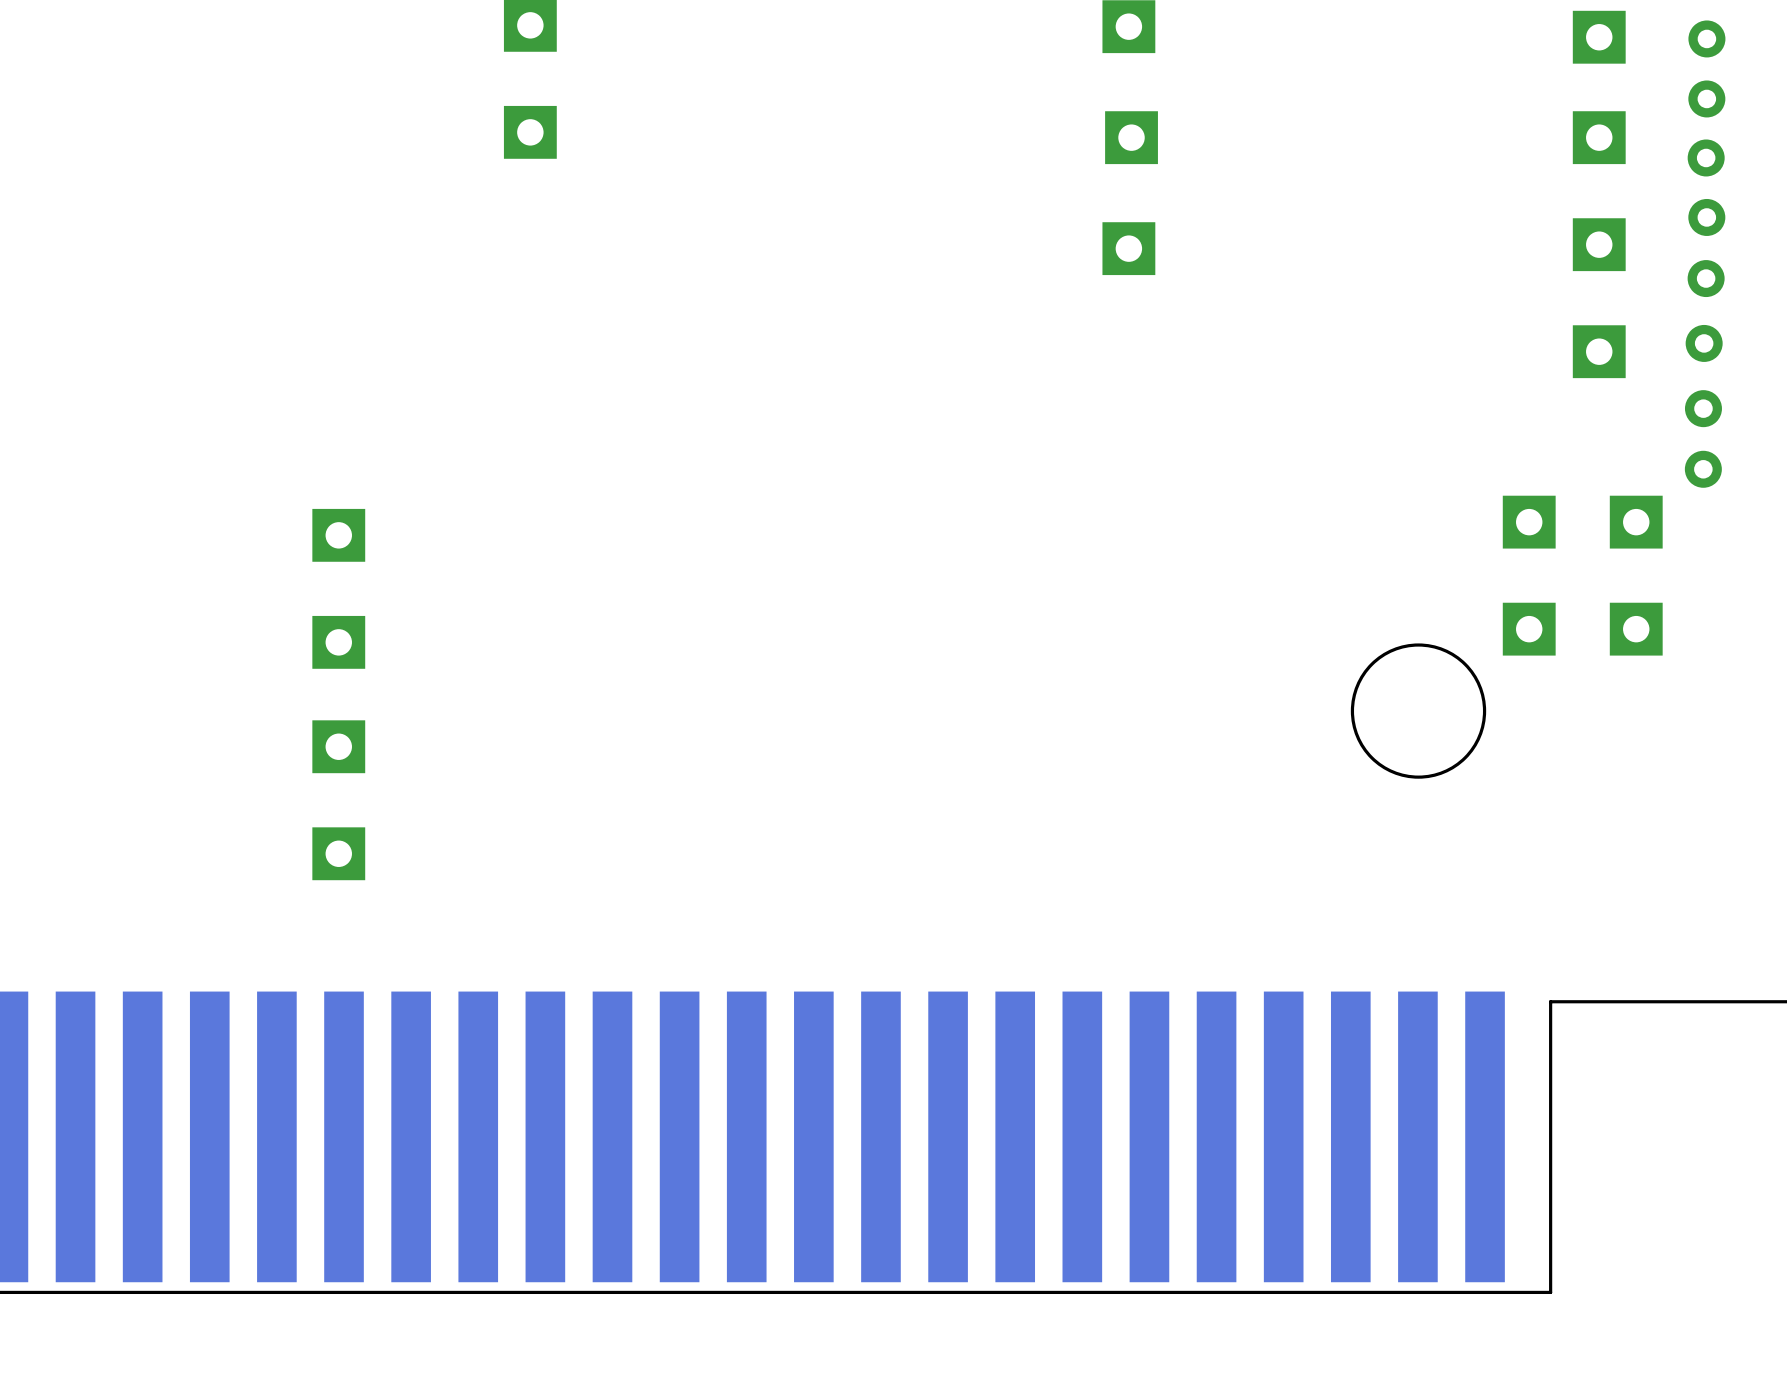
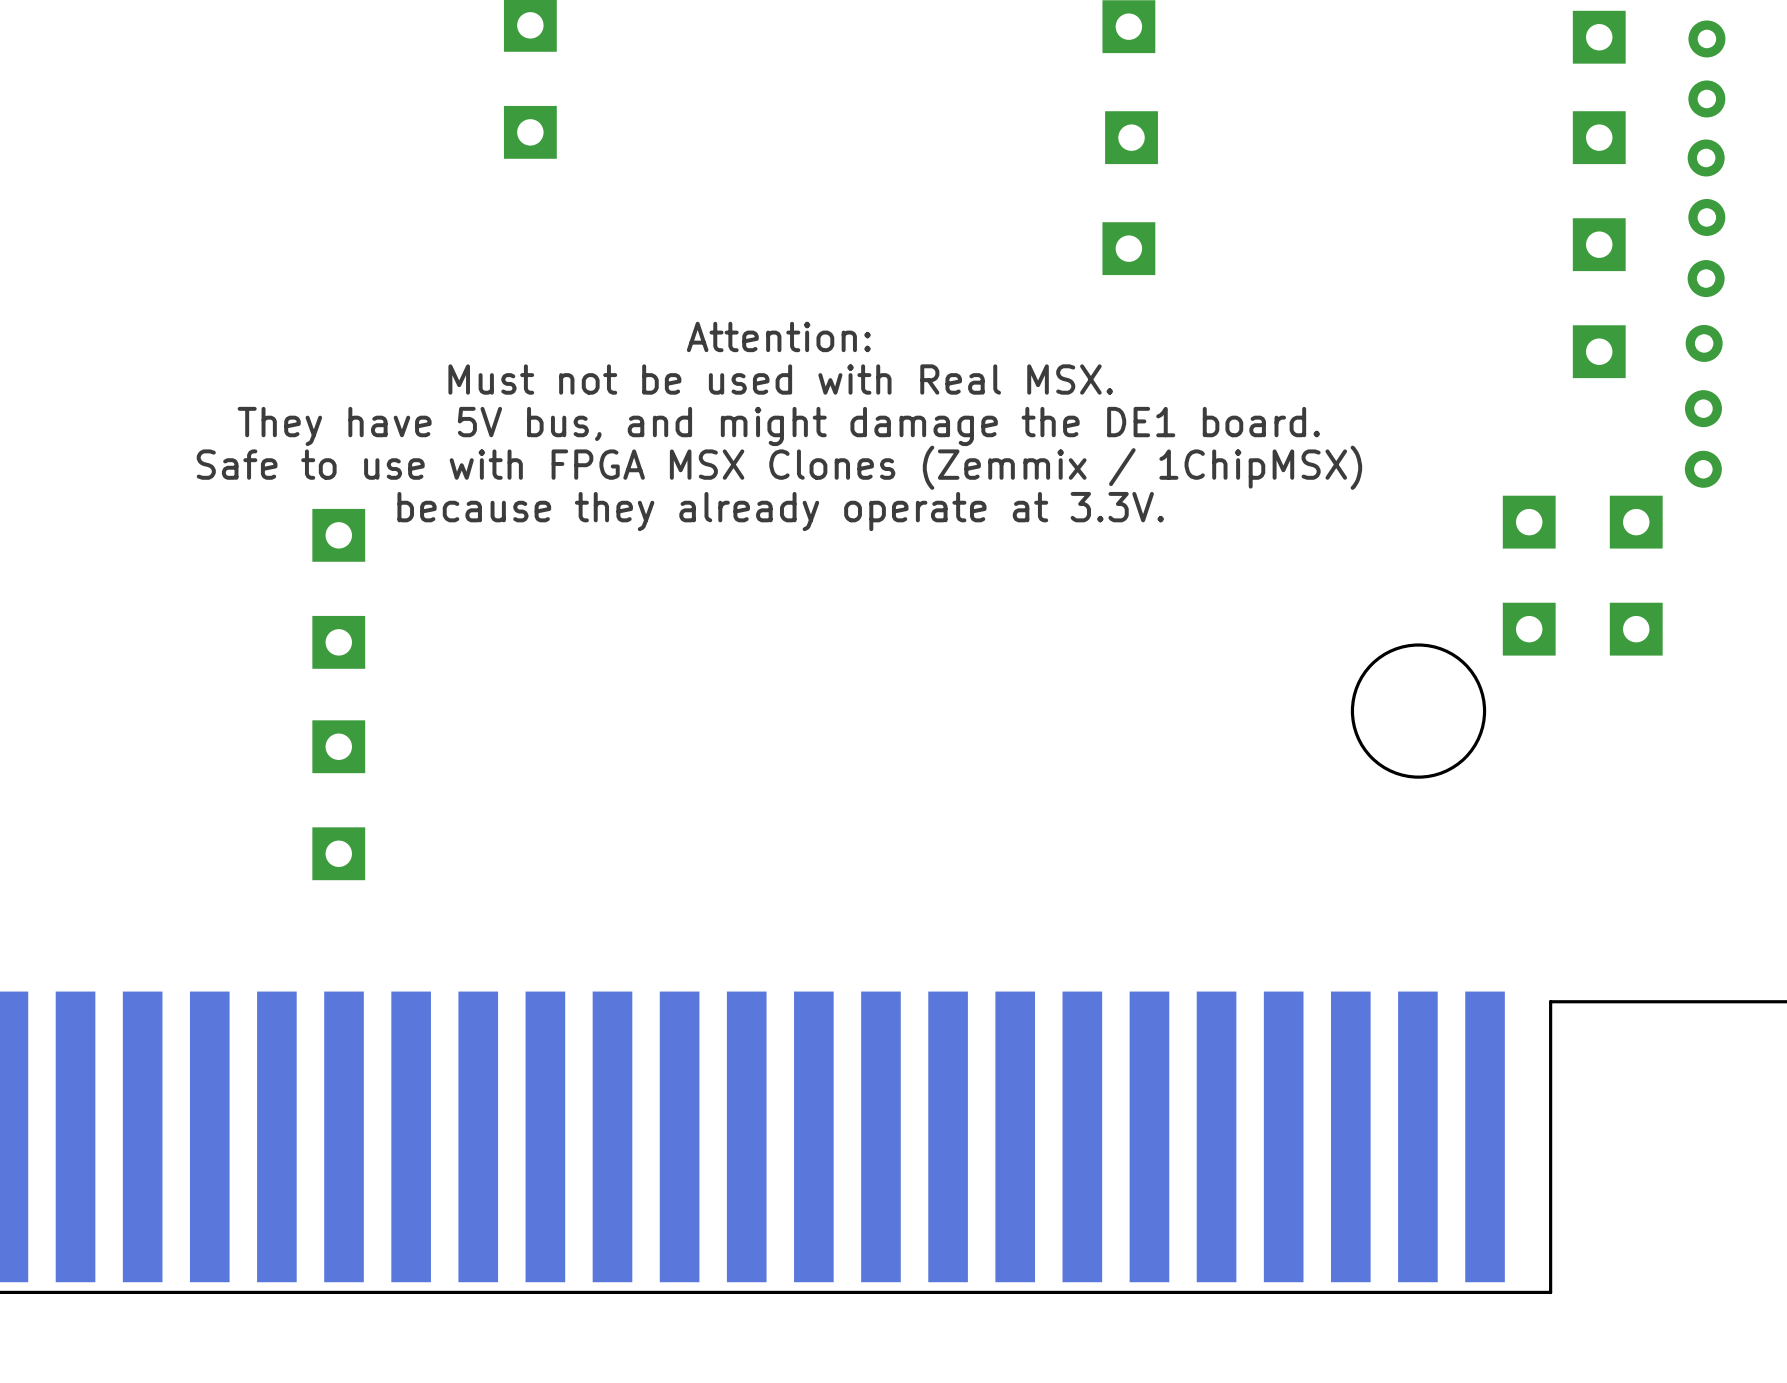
text: none -> Attention: (778, 336)
text: none -> Must not be used with Real MSX. (780, 379)
text: none -> They have 5V bus, and might damage the DE1 board. (778, 426)
text: none -> Safe to use with FPGA MSX Clones (Zemmix / 1ChipMSX) (779, 467)
text: none -> because they already operate at 3.3V. (780, 511)

